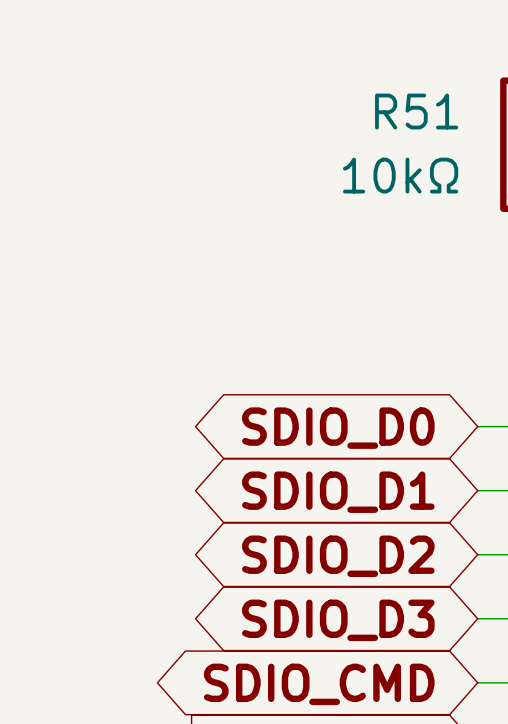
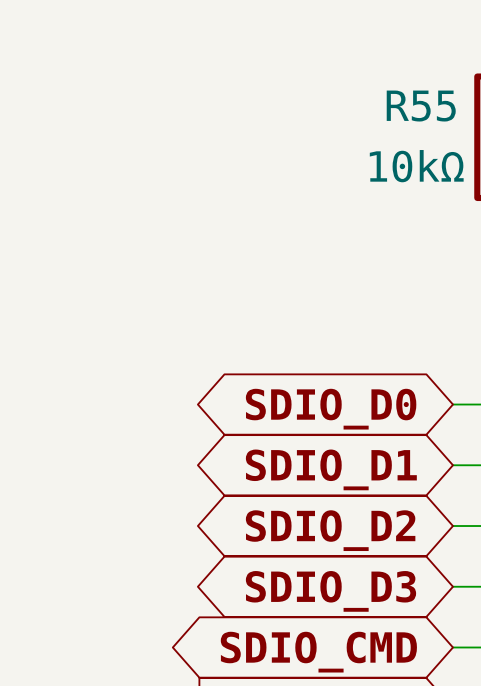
R51 name: R51 (416, 111) -> R55 (421, 106)
R51 value position: 10kΩ (400, 175) -> 10kΩ (416, 166)

